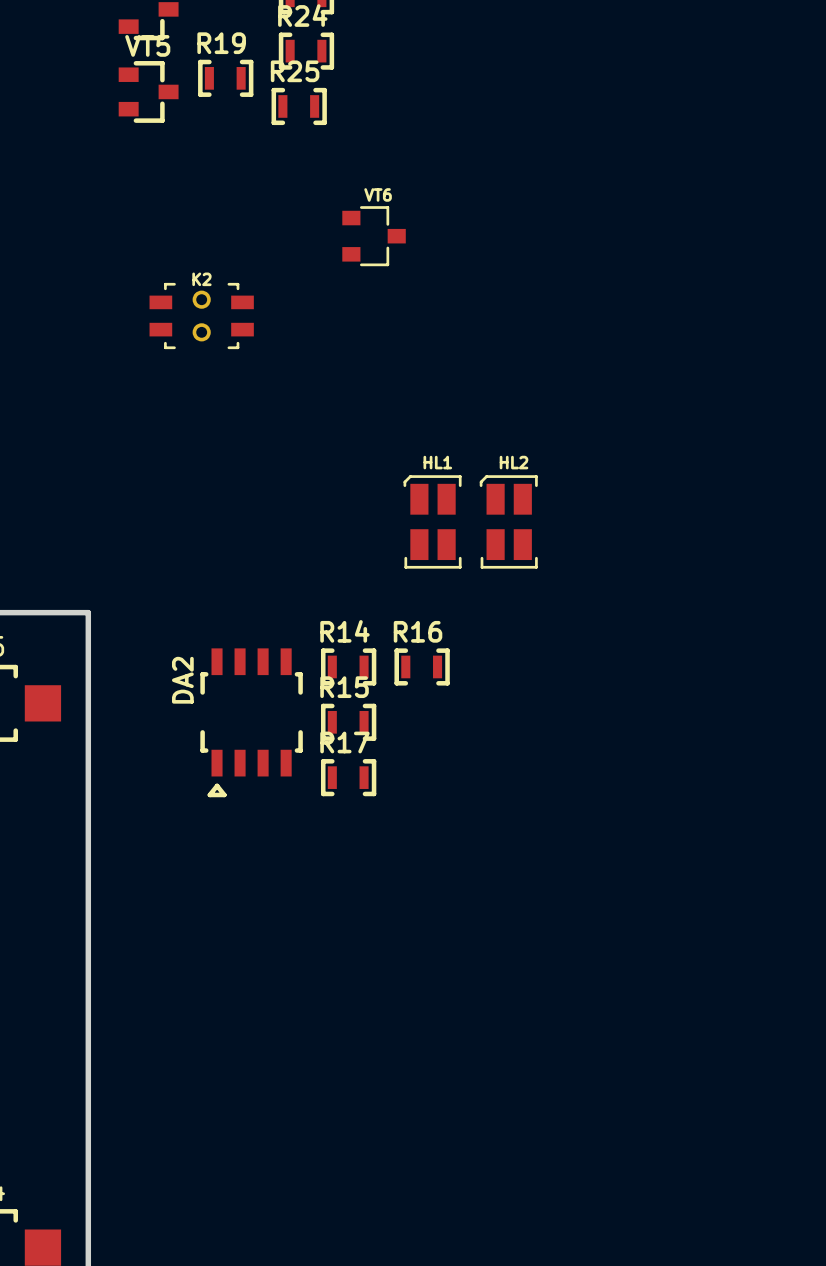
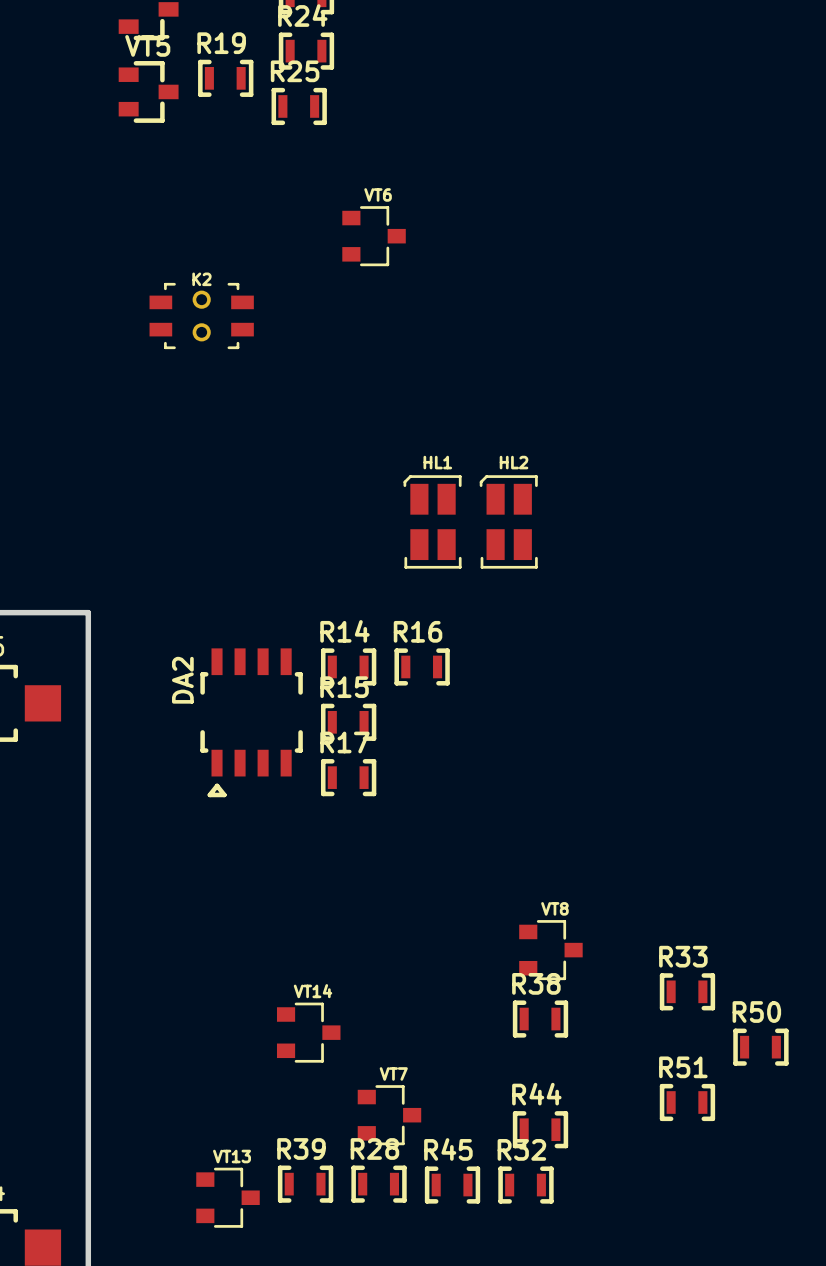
VT8: none -> (550, 950)
R33: none -> (687, 991)
R38: none -> (540, 1019)
VT14: none -> (308, 1032)
R50: none -> (760, 1047)
R51: none -> (687, 1102)
VT7: none -> (389, 1115)
R44: none -> (540, 1129)
R39: none -> (305, 1184)
R28: none -> (379, 1184)
R45: none -> (452, 1185)
R32: none -> (525, 1185)
VT13: none -> (228, 1197)

